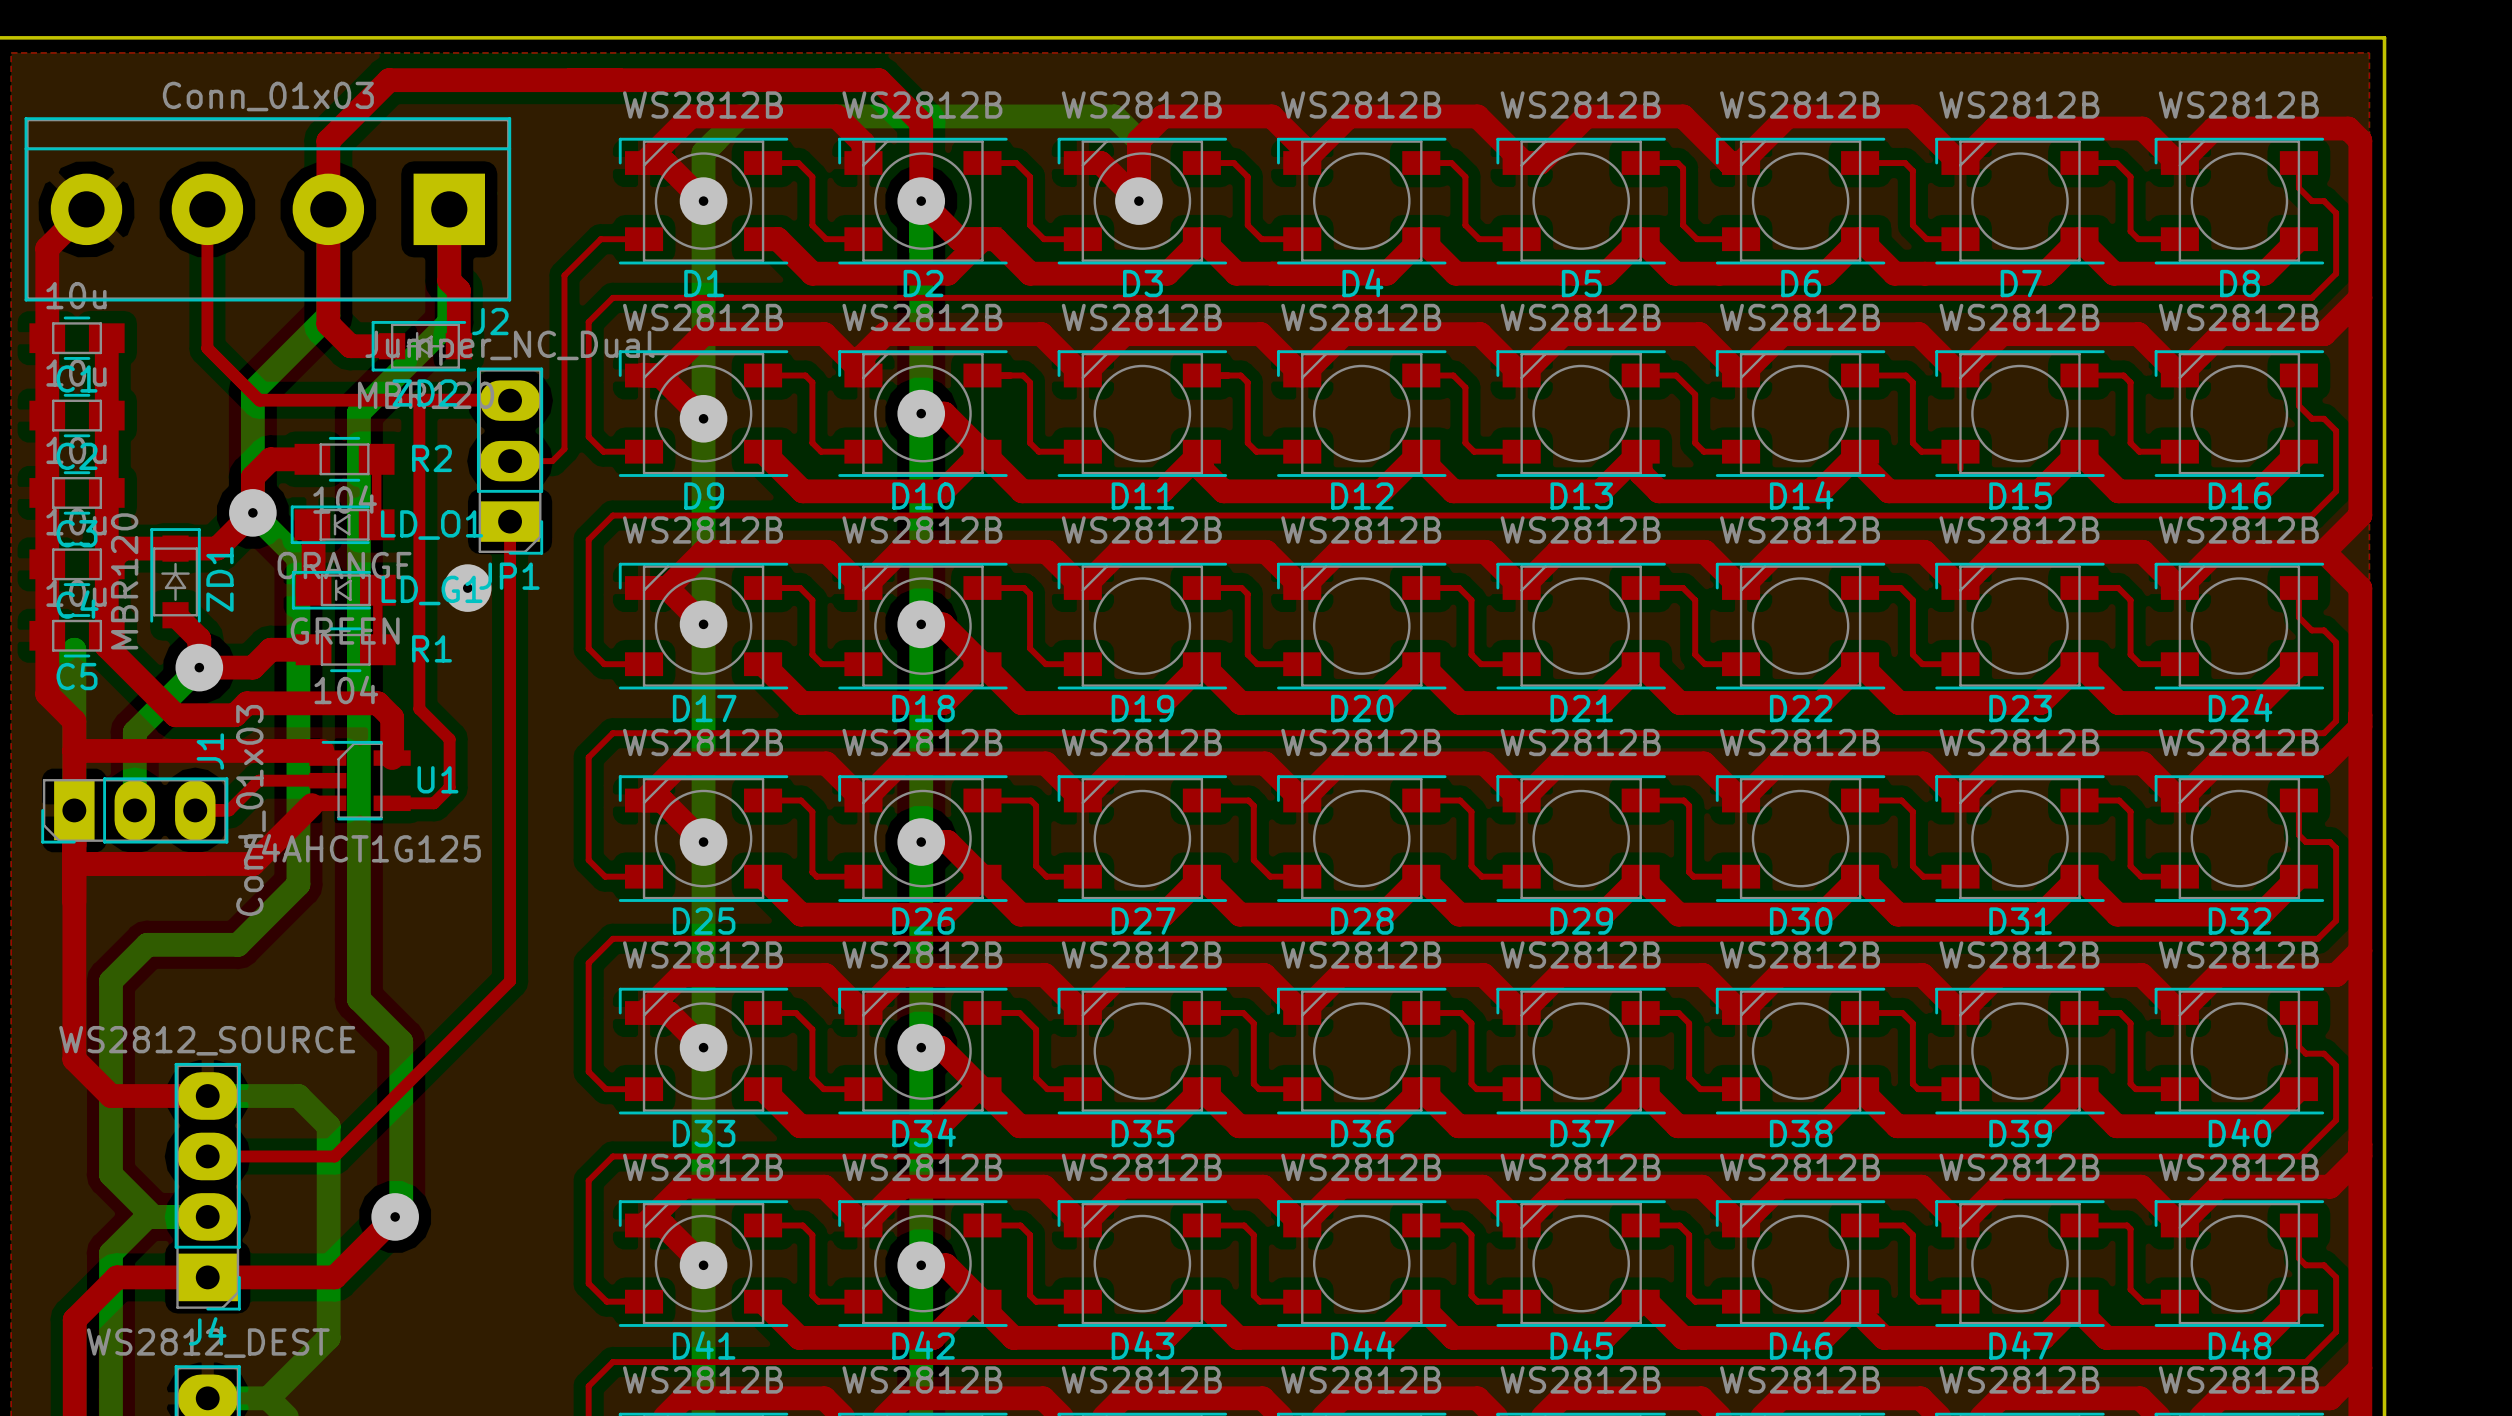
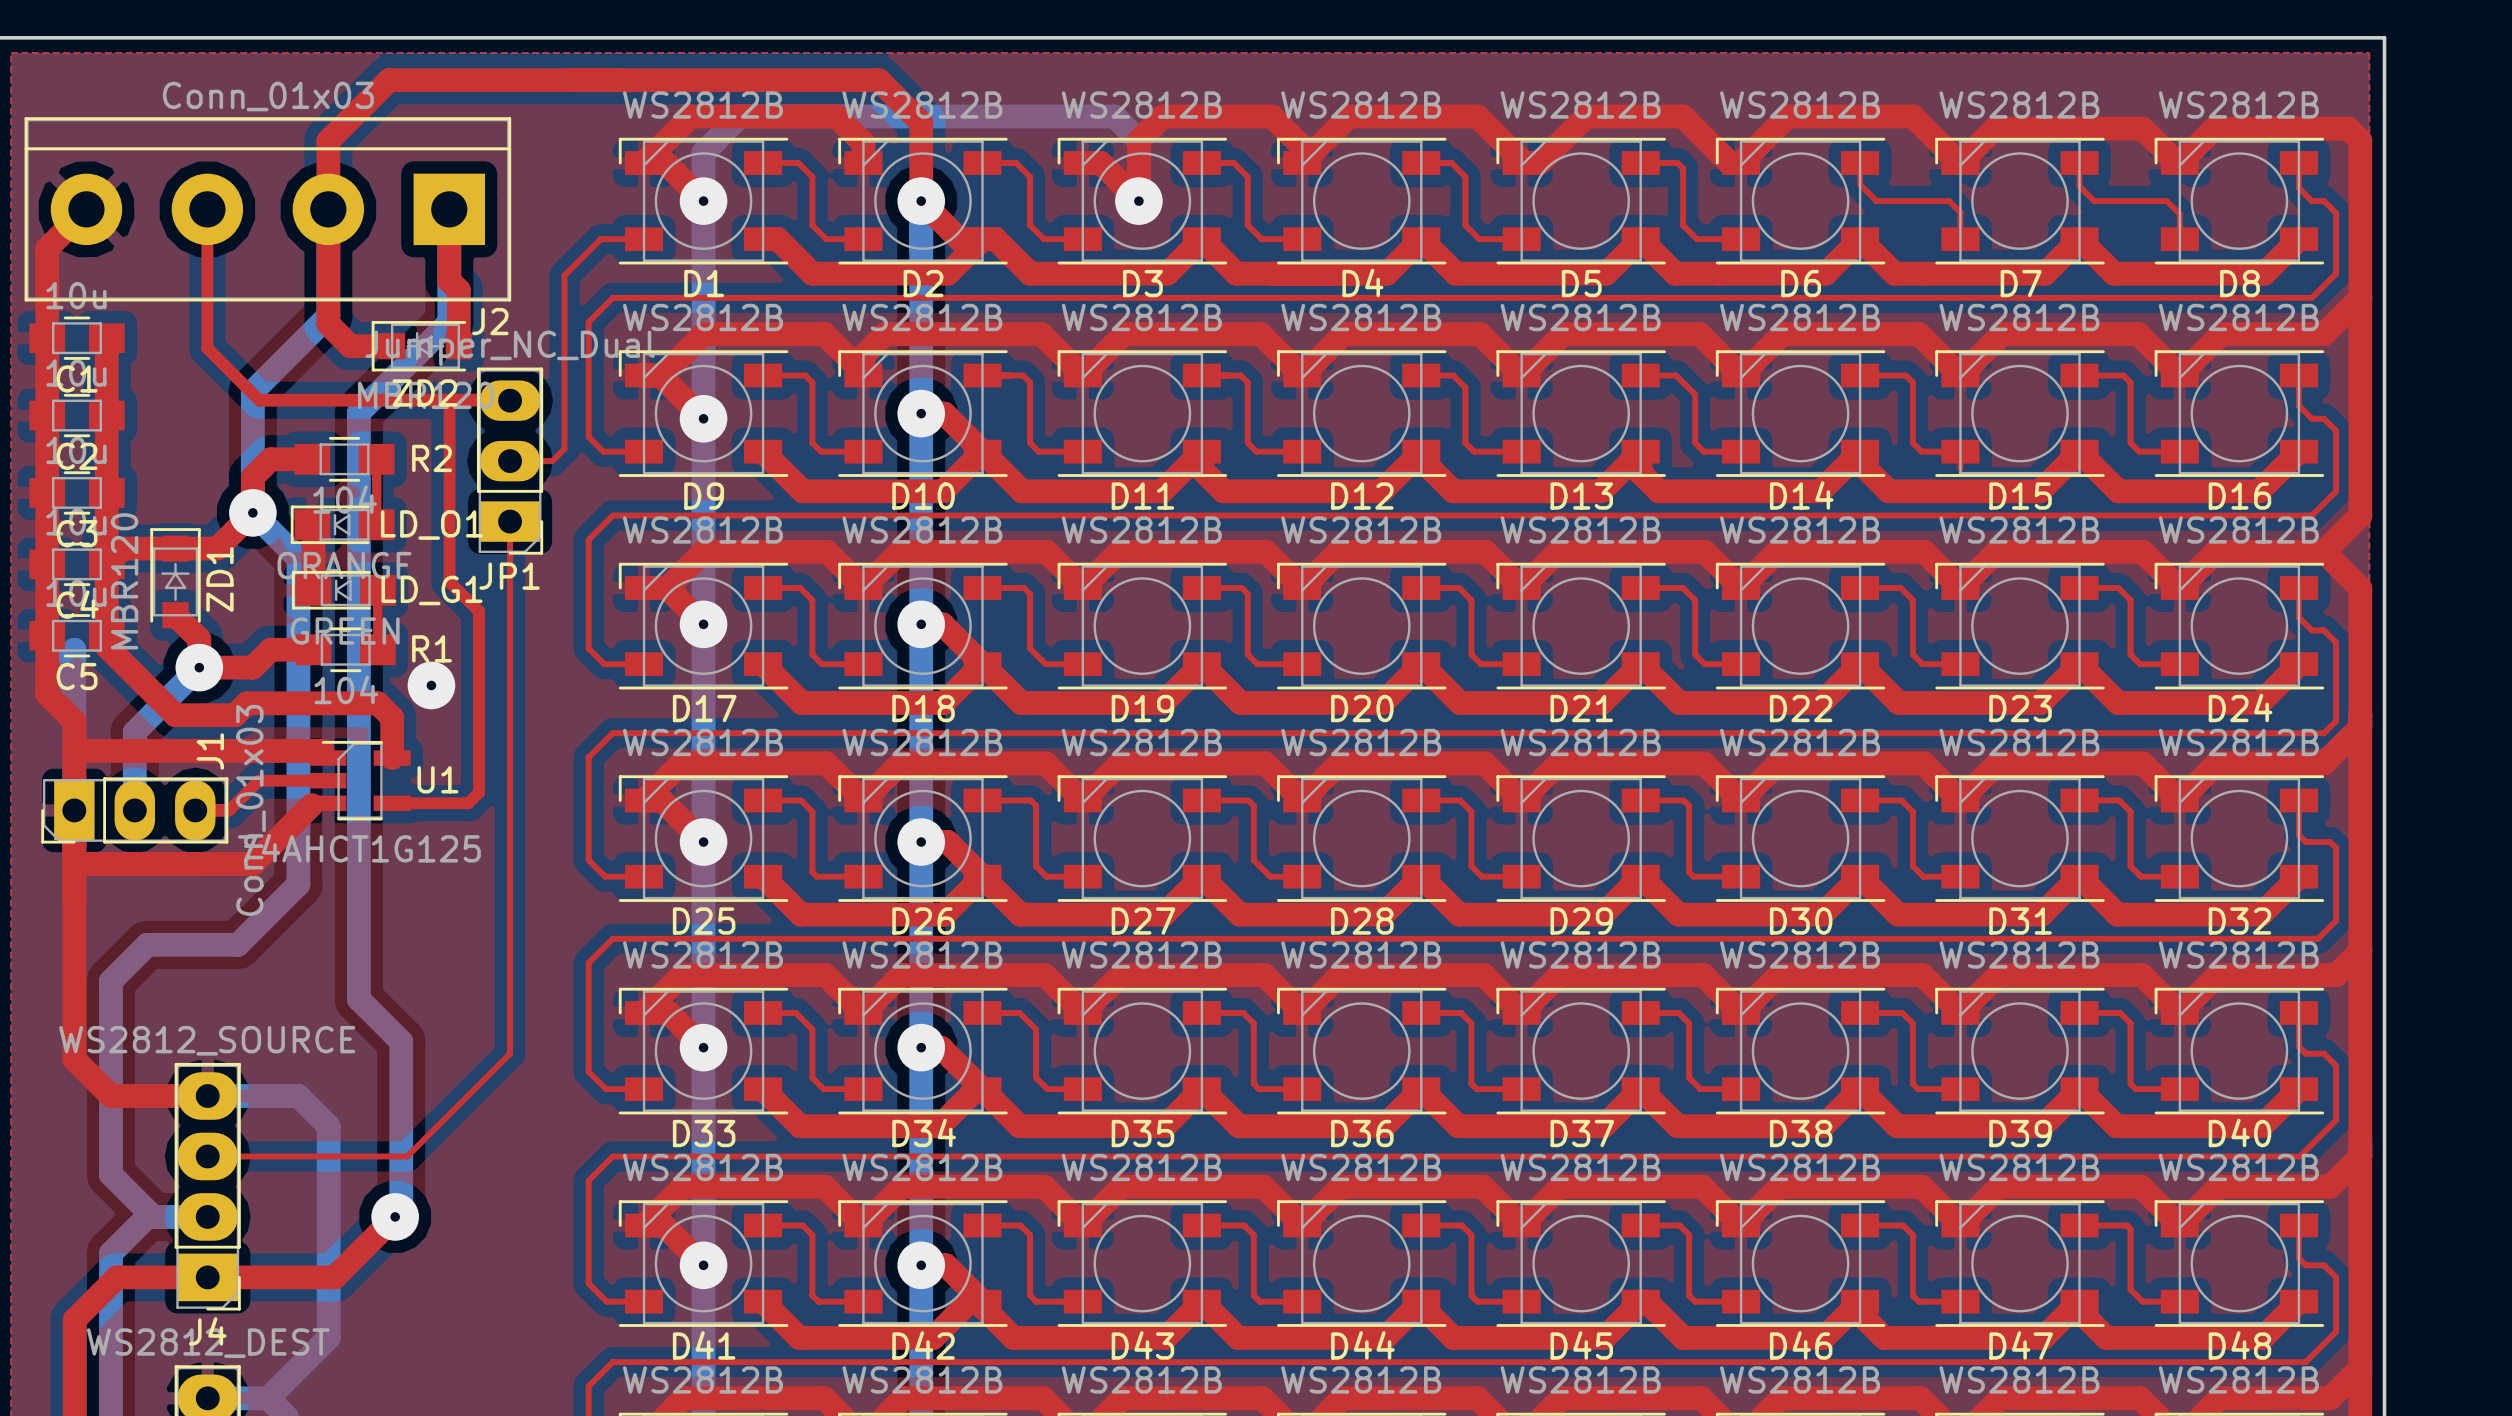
top track: (1860, 163) (1905, 163) (1912, 170) (1912, 225) (1926, 239) (1960, 239) -> (1860, 163) (1860, 184) (1876, 201) (1949, 201) (1960, 212) (1960, 239)
top track: (2079, 163) (2116, 163) (2130, 176) (2130, 231) (2138, 239) (2179, 239) -> (2079, 163) (2079, 186) (2094, 201) (2166, 201) (2179, 214) (2179, 239)
top track: (419, 400) (419, 709) (449, 739) (449, 787) (433, 803) -> (449, 400) (449, 582) (479, 611) (479, 792) (468, 803) (433, 803)
top track width: thick (510, 521) (510, 981) -> thin (510, 521) (510, 981)
via position: (467, 588) -> (431, 685)
top track: (510, 981) (334, 1156) -> (510, 981) (510, 1053) (407, 1156) (334, 1156)
top track width: thick (207, 1156) (334, 1156) -> thin (207, 1156) (334, 1156)

